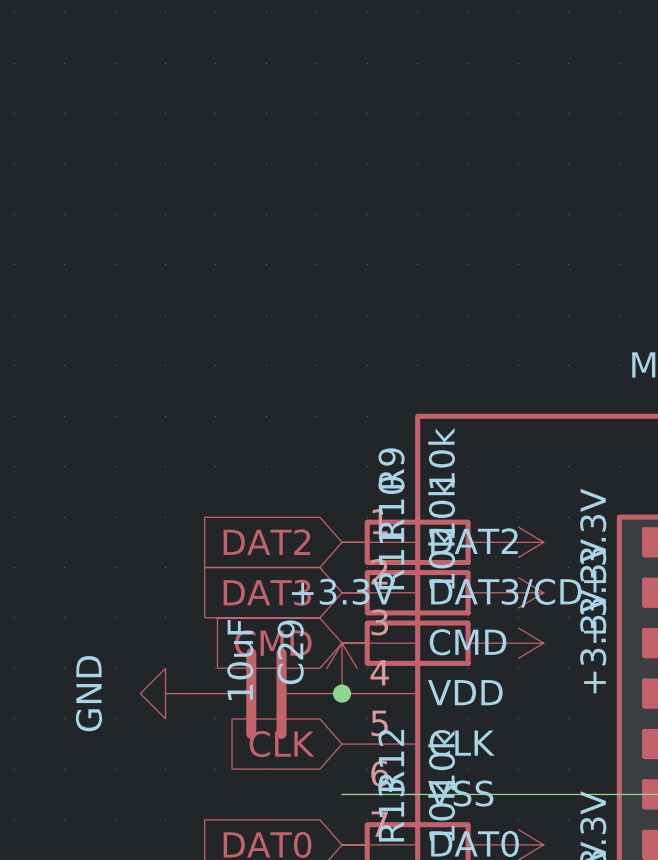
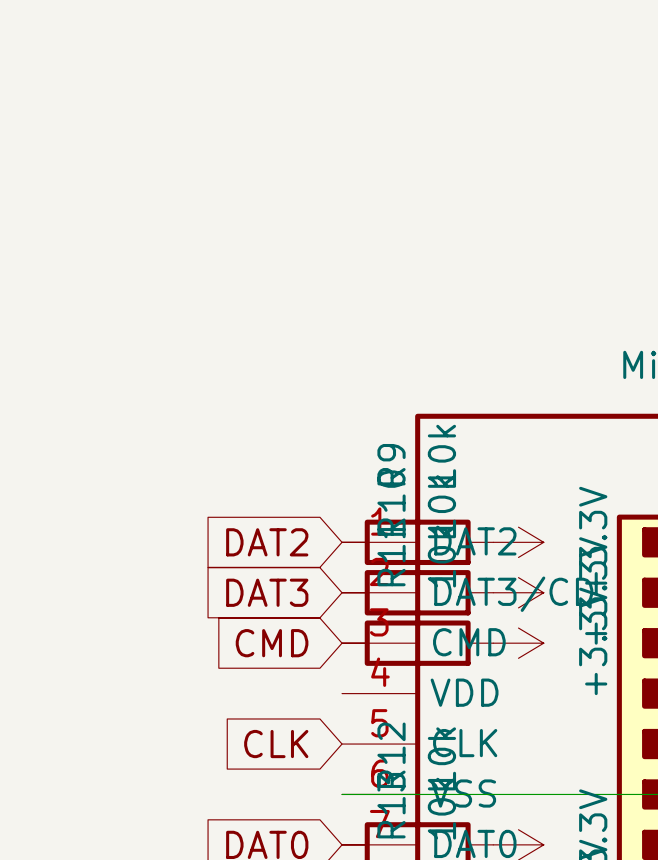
power symbol: +3.3V (342, 668) -> none
power symbol: GND (165, 693) -> none
C29: 10uF (266, 693) -> none
junction: (342, 693) -> none

